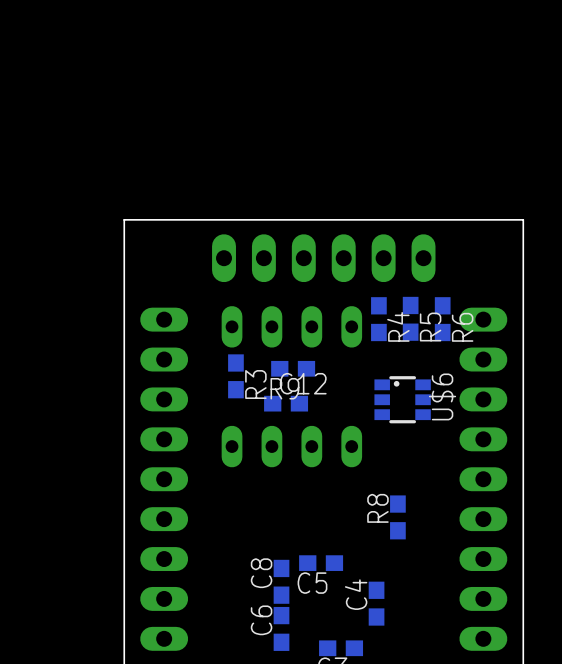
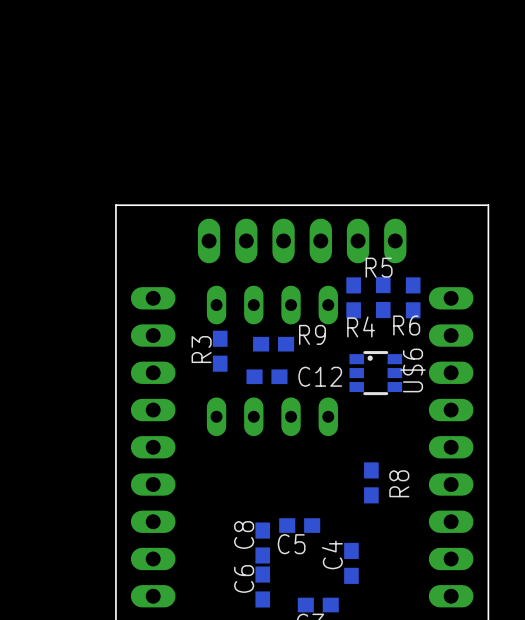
R4 name rotation: 0° (398, 326) -> 90° clockwise (361, 326)
R5 name rotation: 0° (430, 327) -> 90° clockwise (379, 267)
R5 name position: R5 (430, 327) -> R5 (379, 267)
R6 name rotation: 0° (462, 327) -> 90° clockwise (406, 325)
C12 name position: C12 (303, 383) -> C12 (320, 376)
R3 name position: R3 (255, 384) -> R3 (201, 349)
R9 name position: R9 (284, 388) -> R9 (312, 334)
R8 name position: R8 (377, 508) -> R8 (399, 483)

